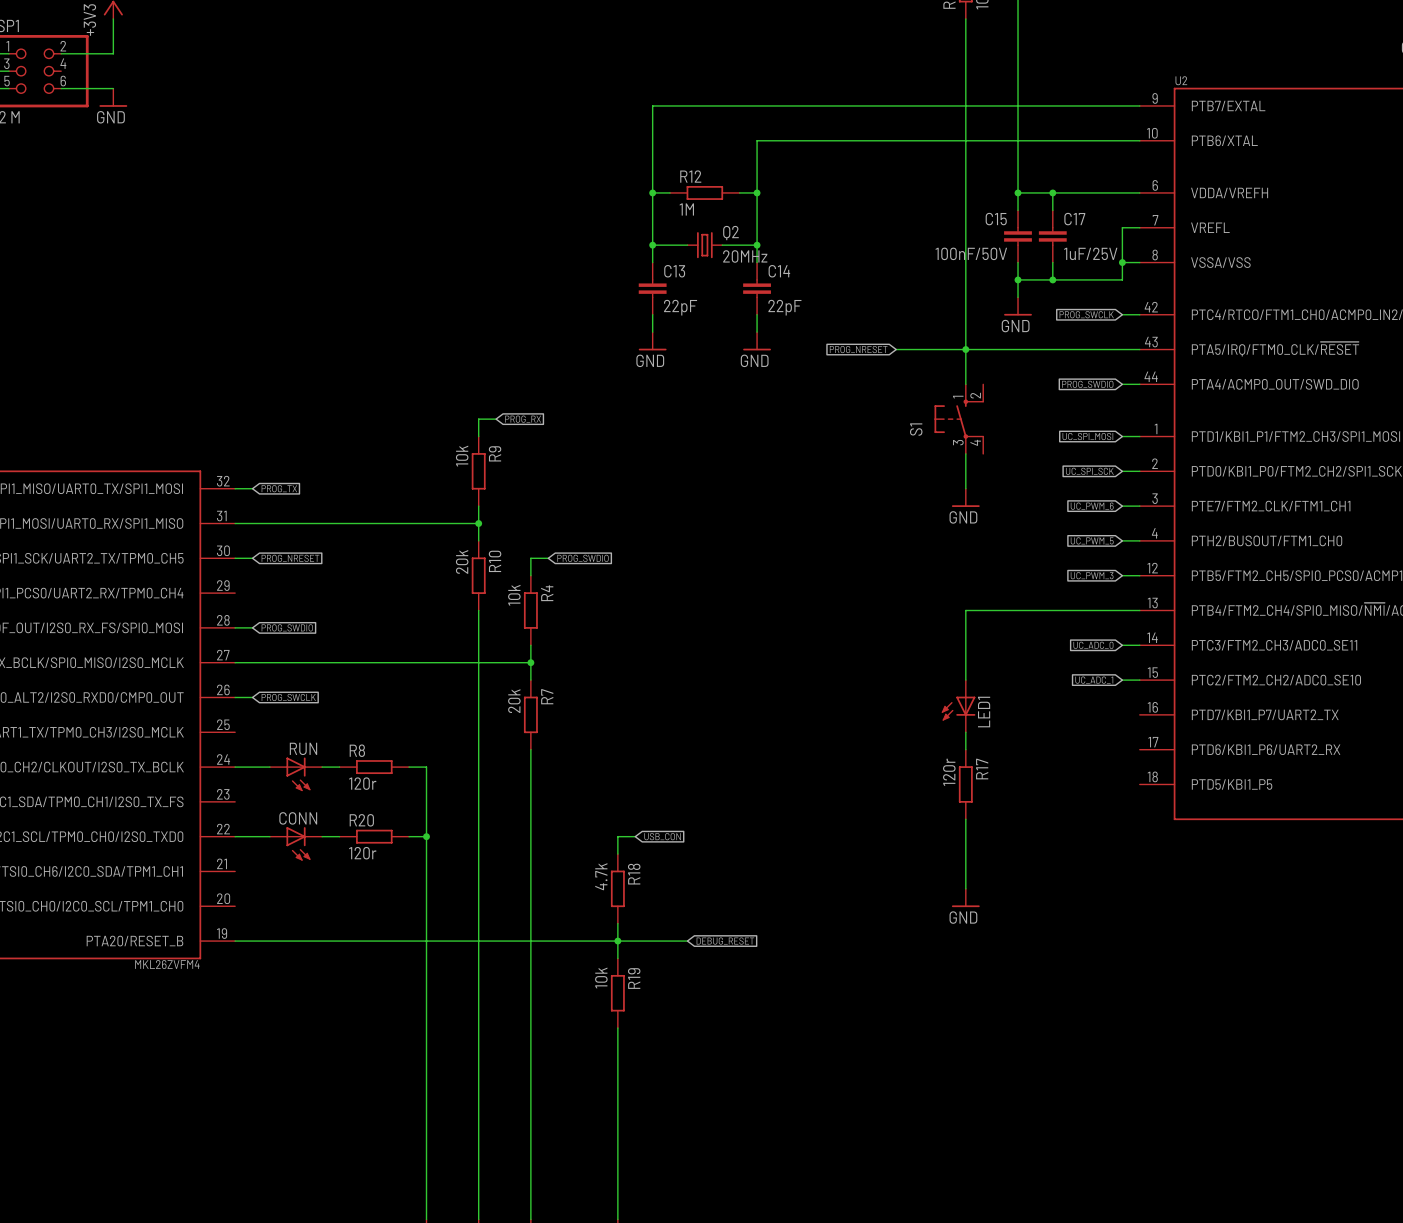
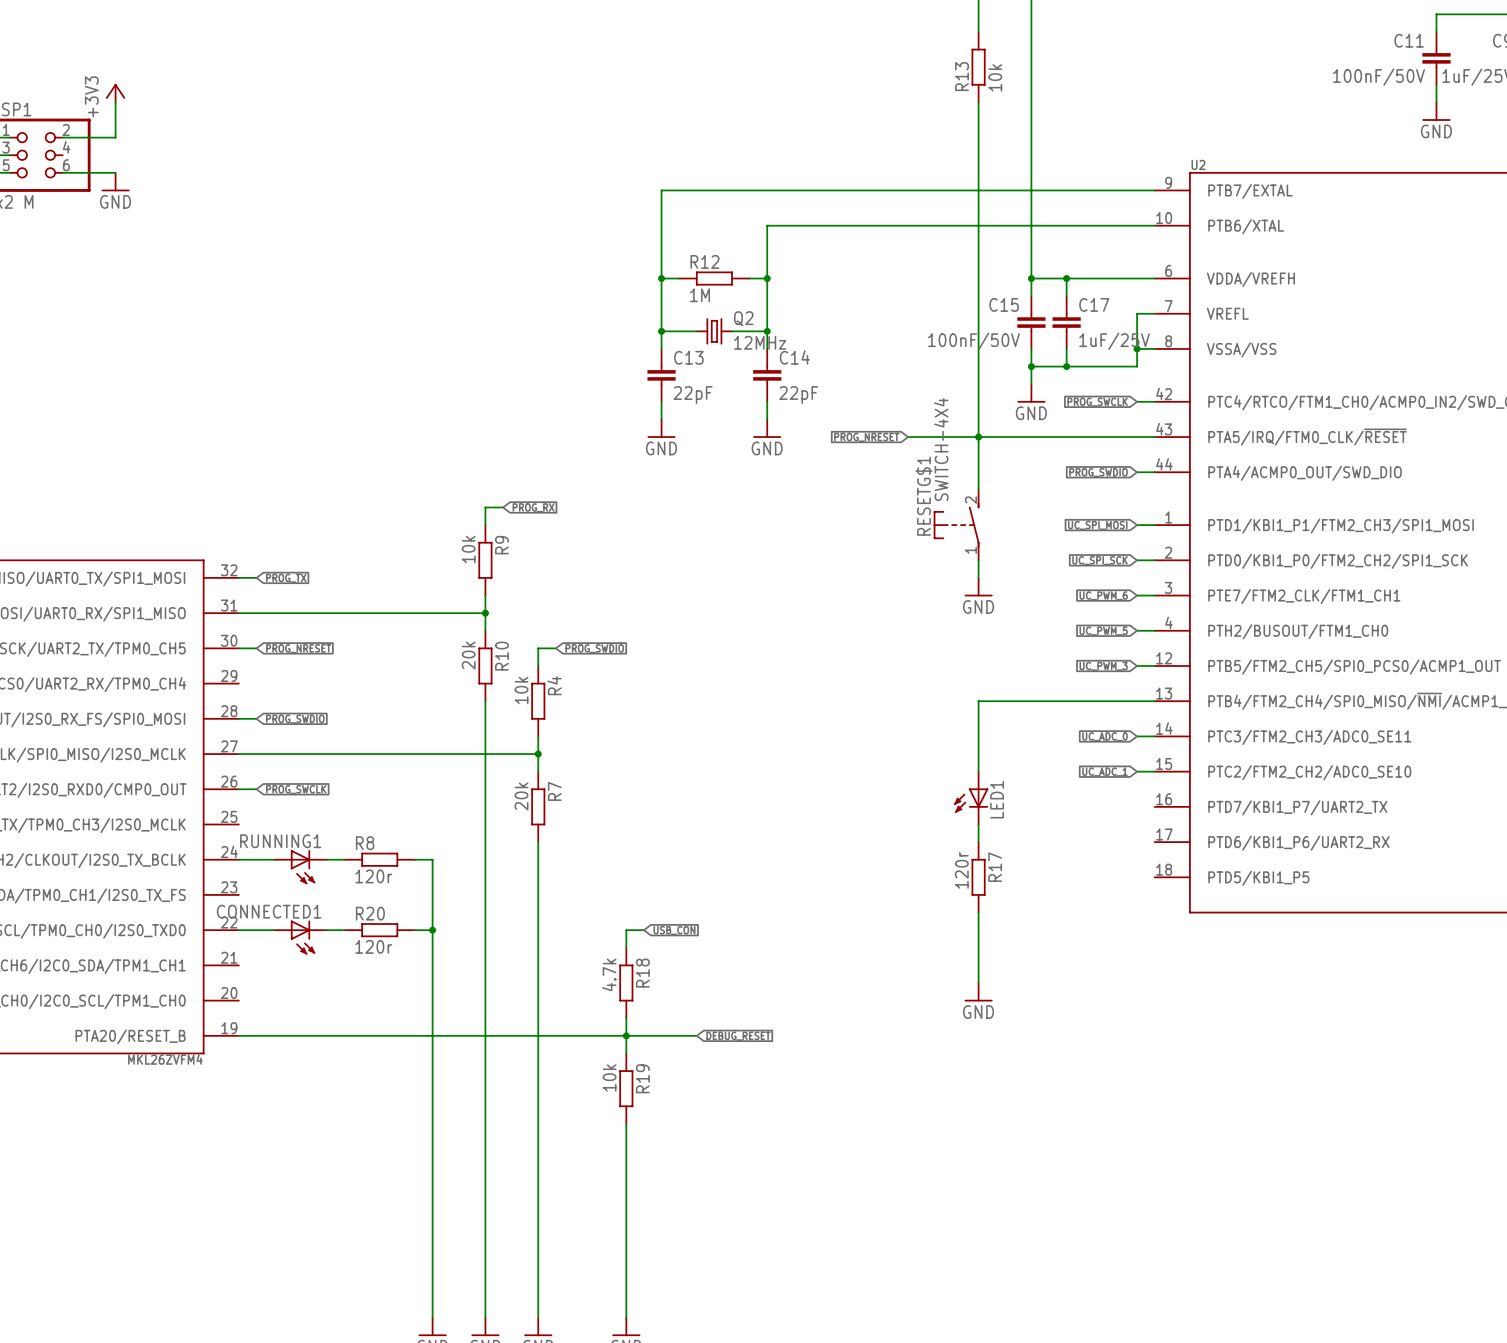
Q2 value: 20MHz (745, 256) -> 12MHz (760, 342)
S1: (959, 419) -> none
RESETG$1: none -> SWITCH-4X4 (956, 525)
RUN name: RUN (303, 748) -> RUNNING1 (280, 841)
CONN name: CONN (298, 818) -> CONNECTED1 (269, 911)

